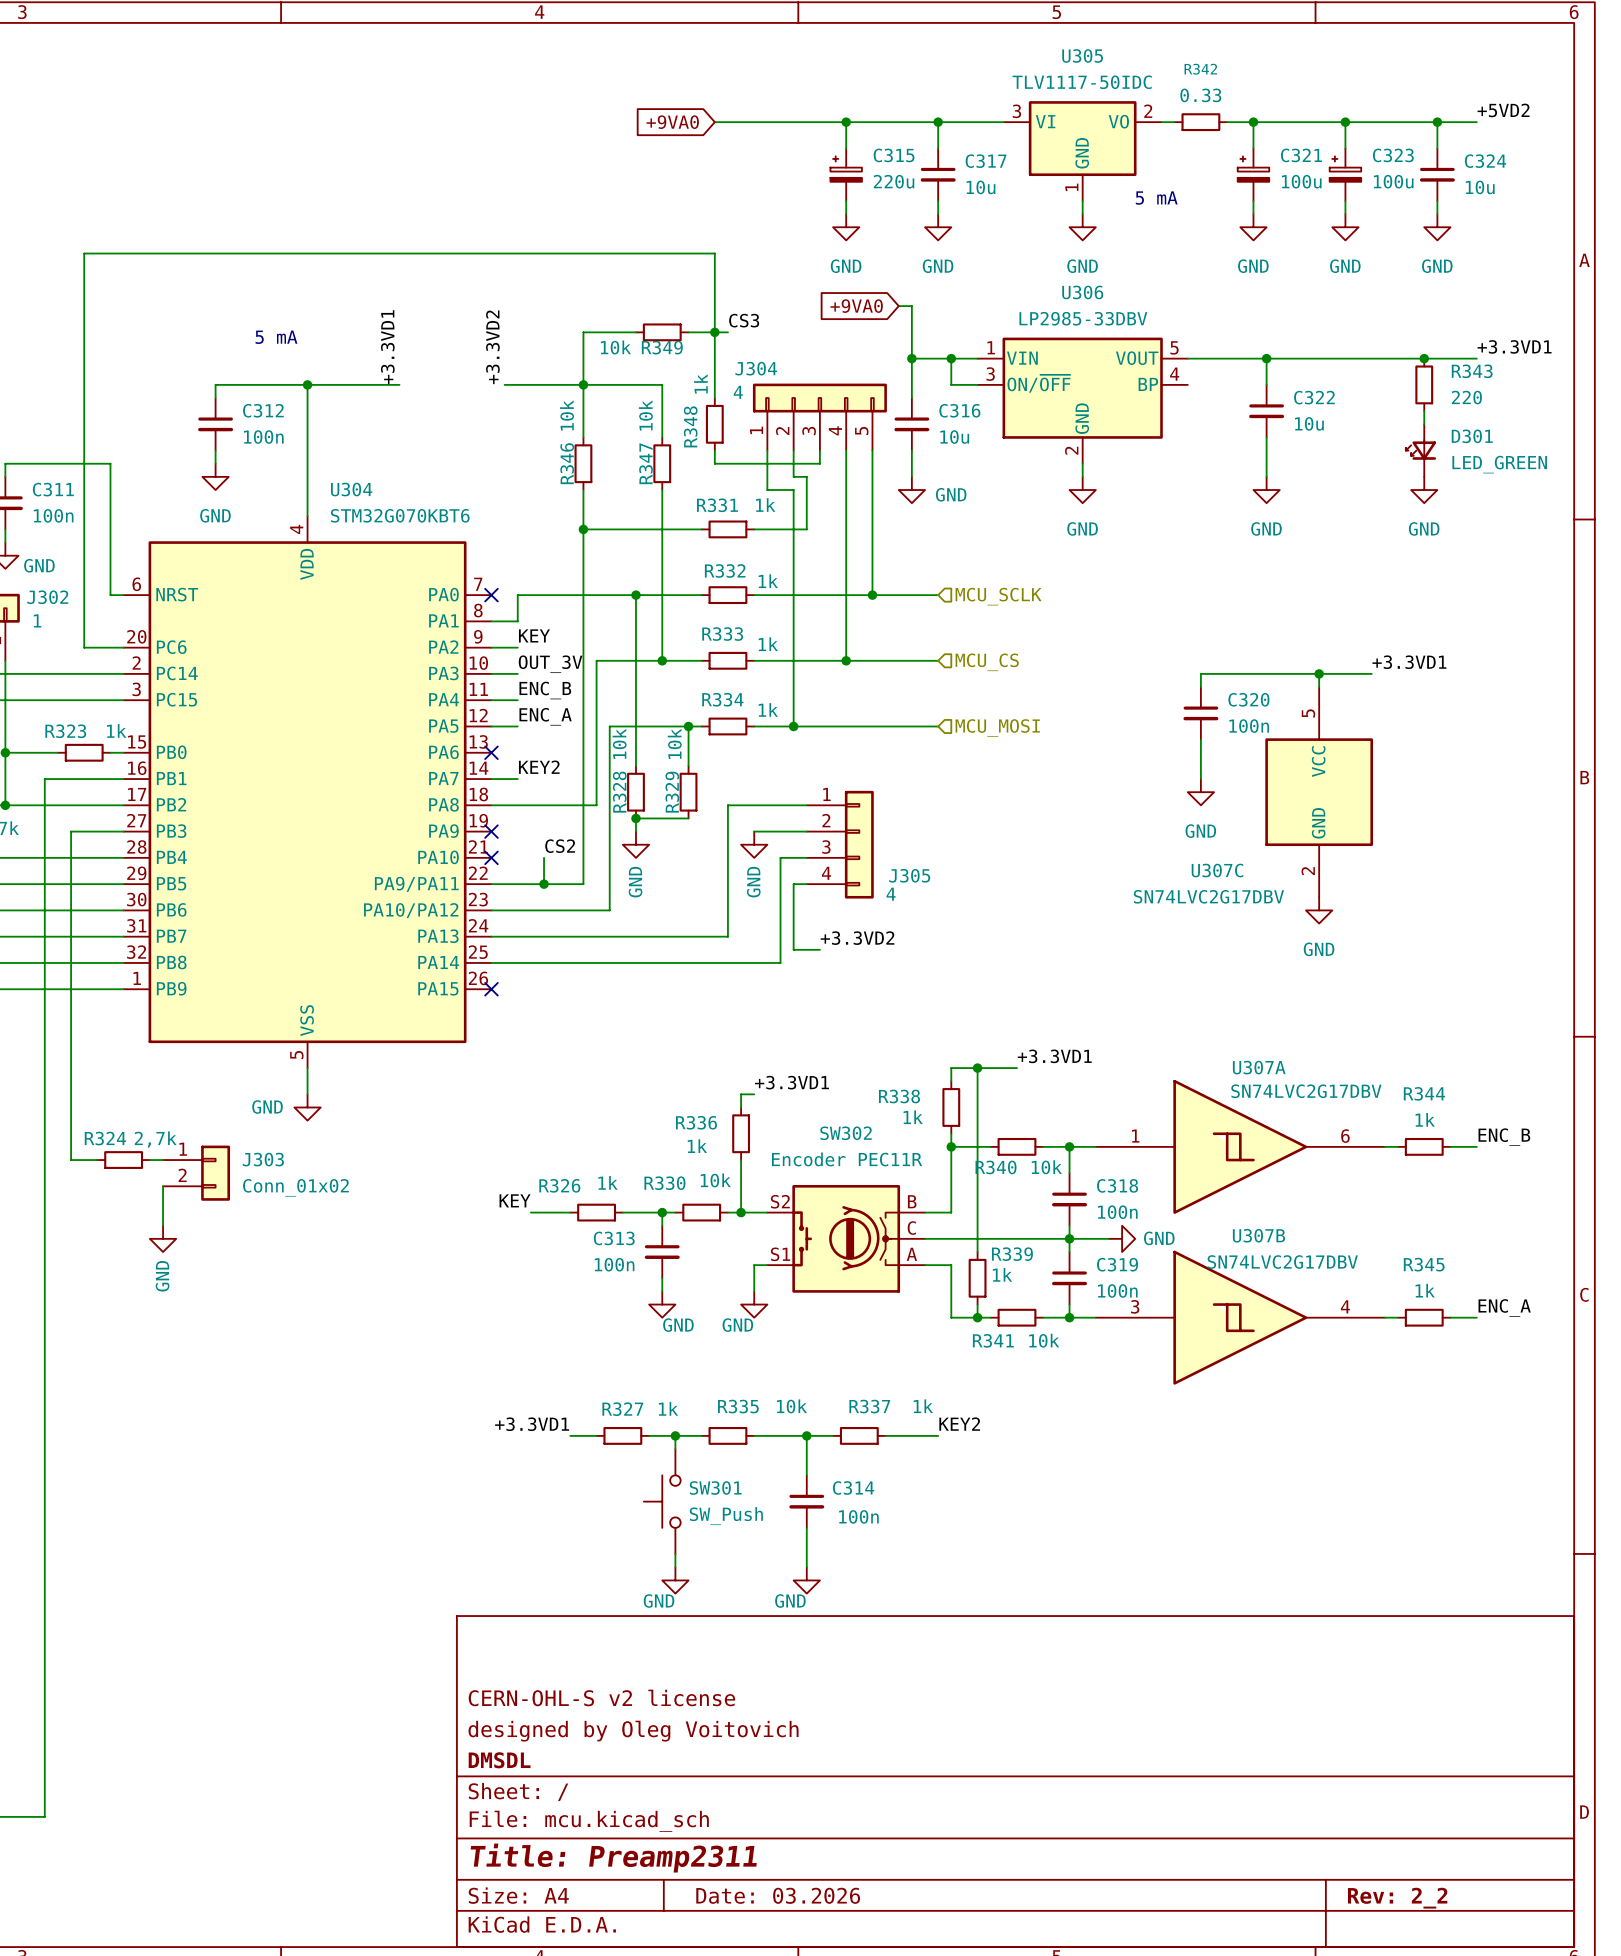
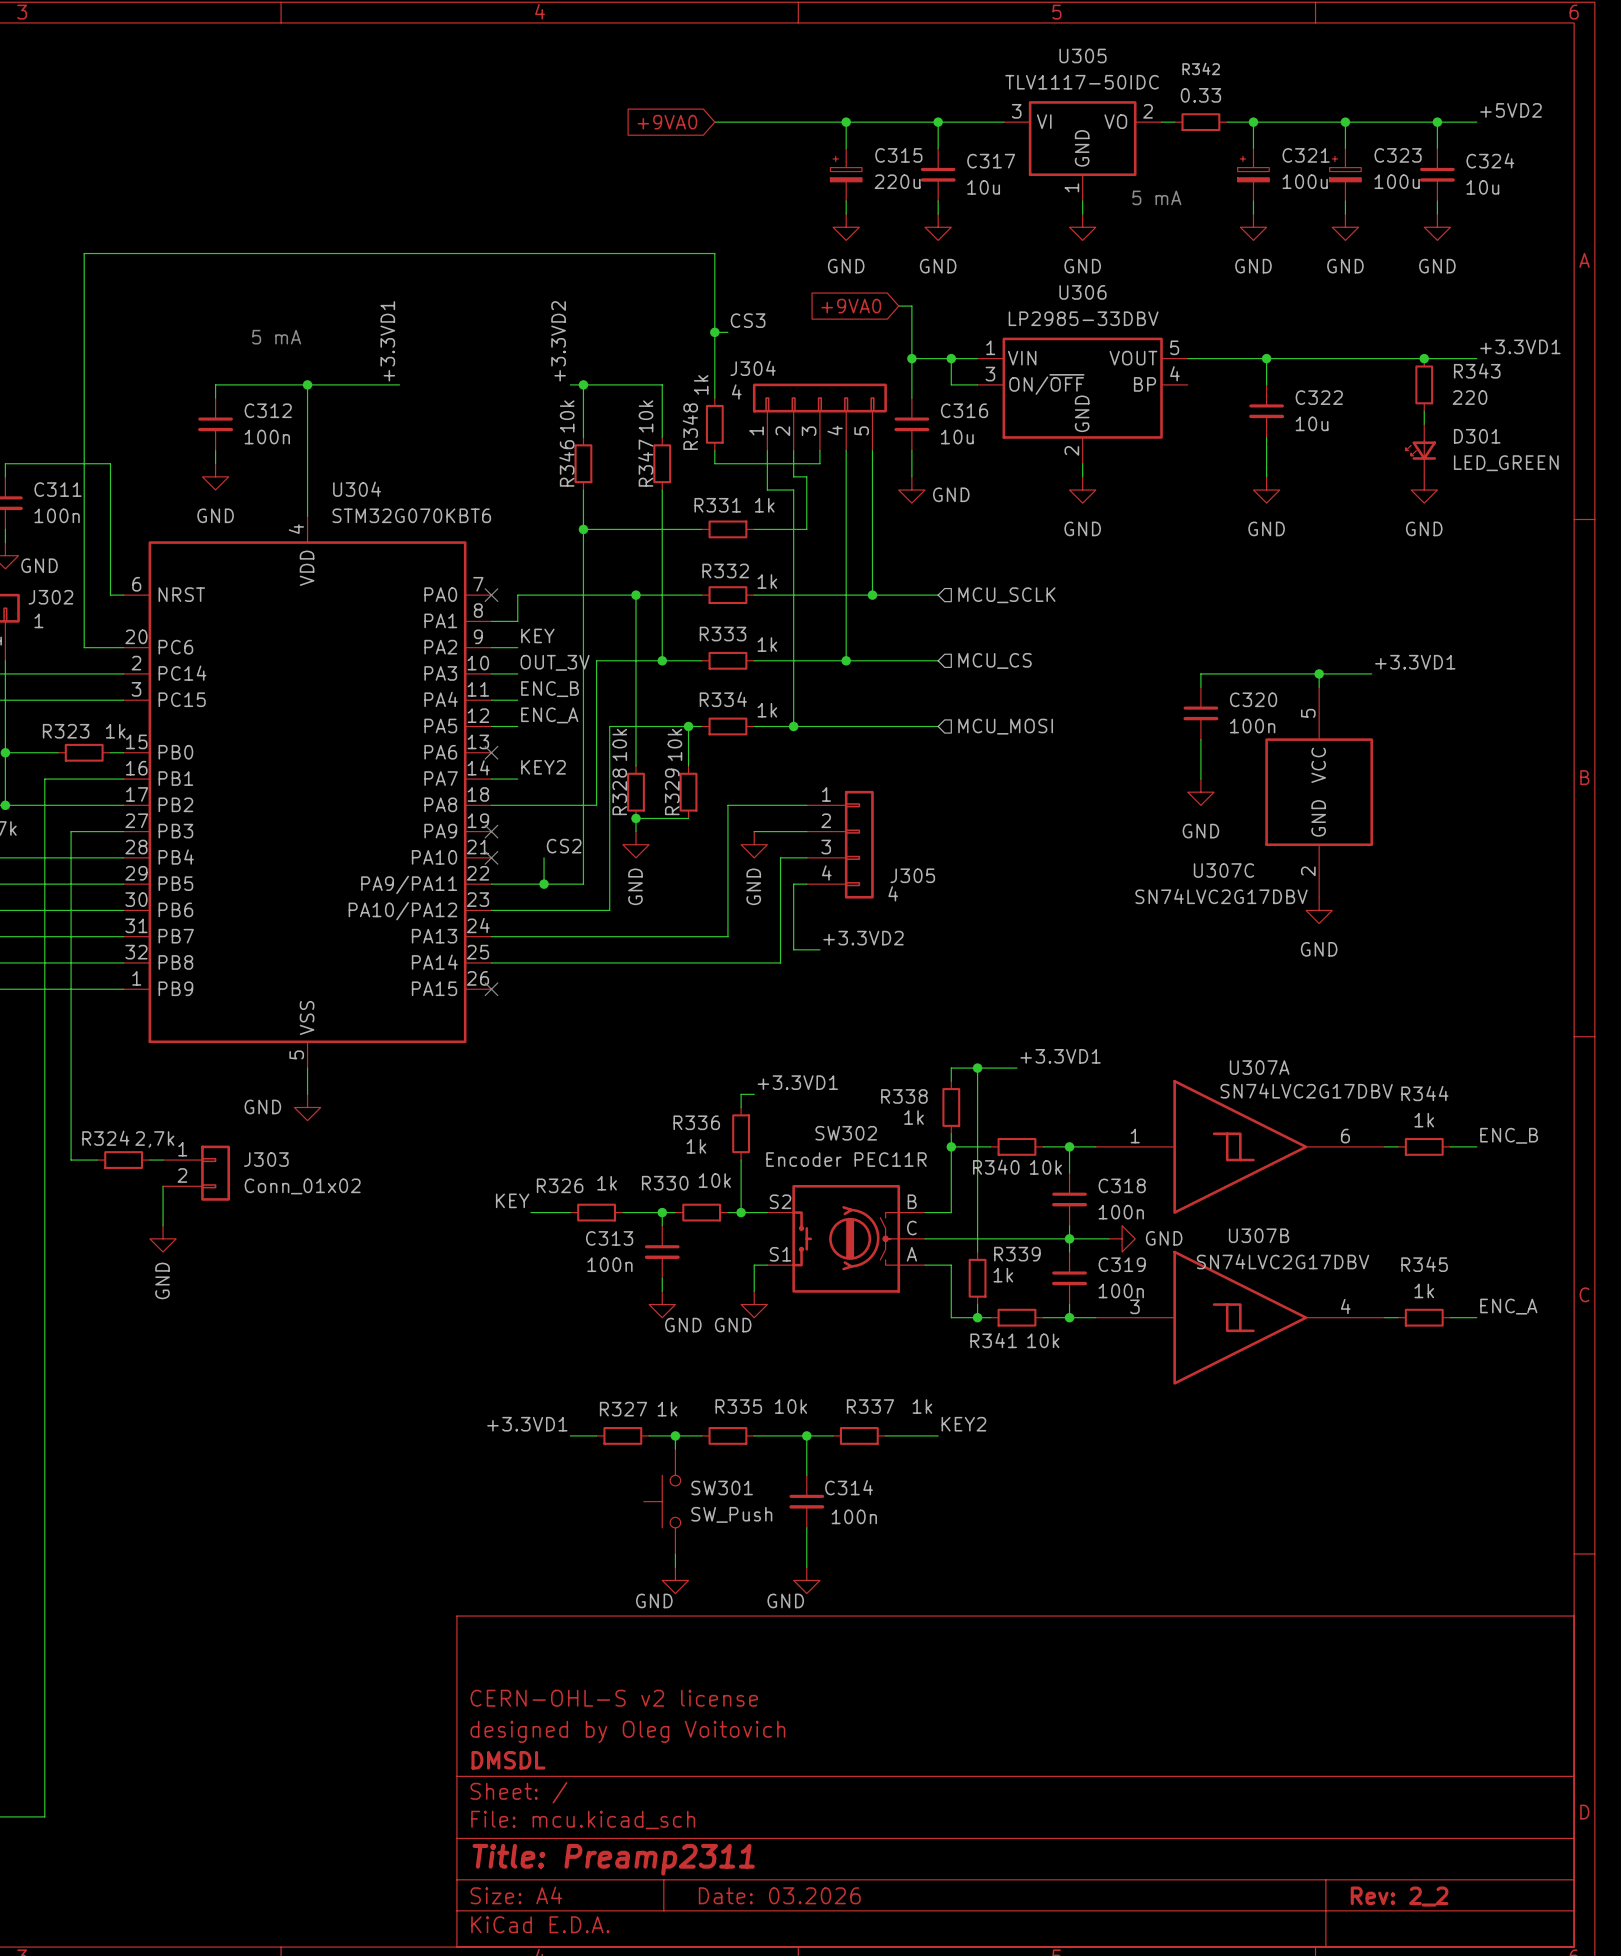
wire: (635, 332) (583, 332) (583, 384) -> none
R349: 10k (662, 332) -> none
wire: (688, 332) (714, 332) -> none
label position: +3.3VD2 (492, 347) -> +3.3VD2 (558, 341)
wire: (504, 384) (570, 384) -> none

